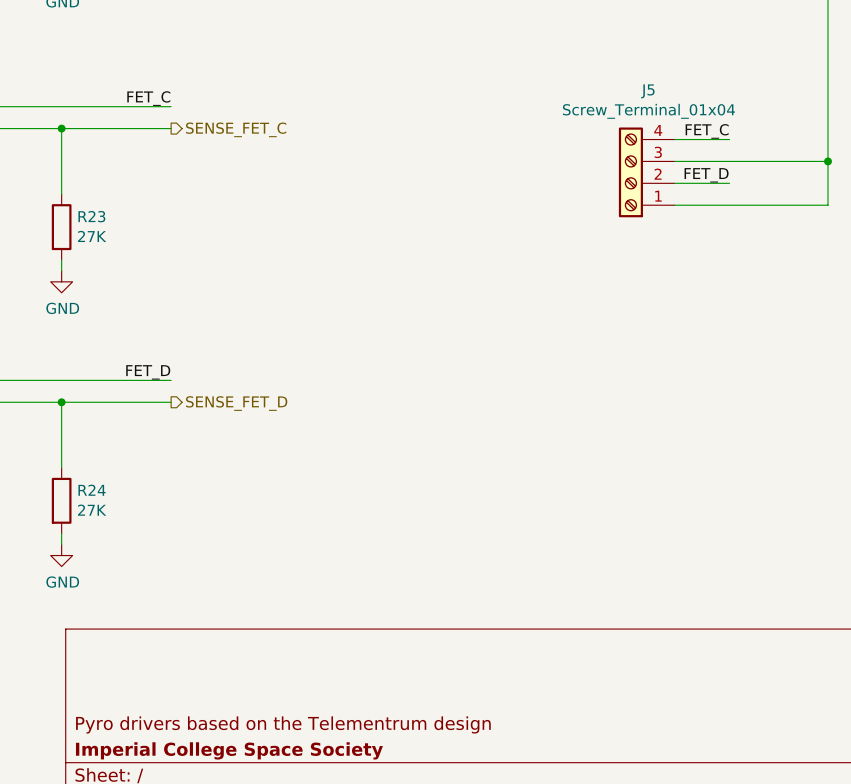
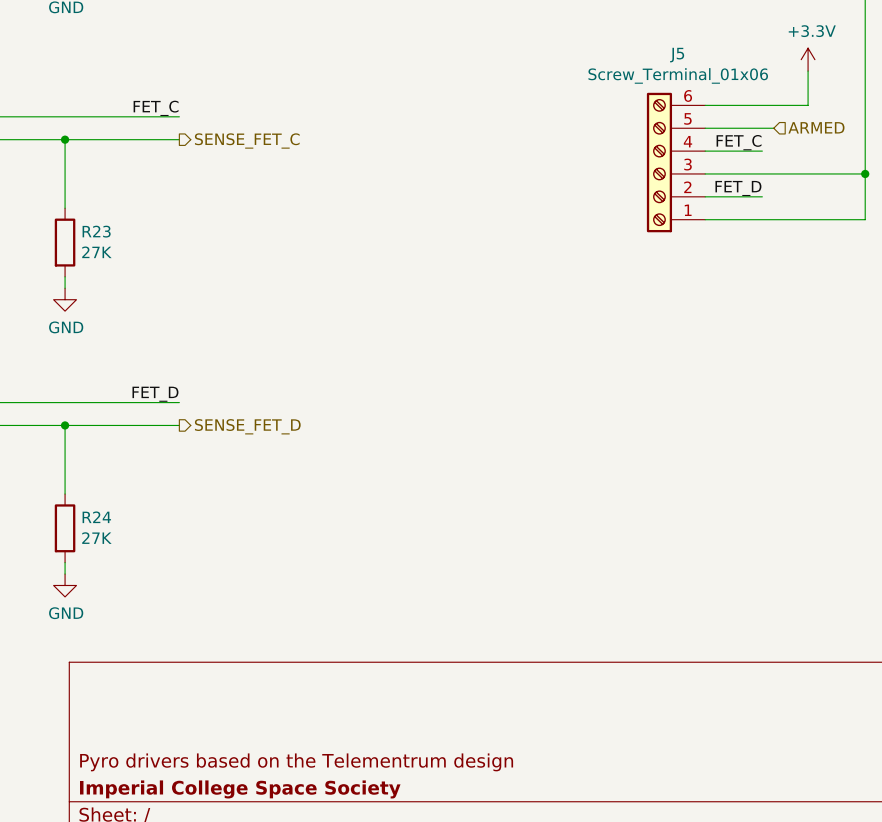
power symbol: none -> +3.3V (808, 59)
wire: none -> (808, 71) (808, 105) (705, 105)
J5 name position: J5 (647, 91) -> J5 (677, 55)
J5 value: Screw_Terminal_01x04 (648, 111) -> Screw_Terminal_01x06 (678, 75)
wire: none -> (705, 128) (773, 128)
hierarchical label: none -> ARMED (816, 127)
J5 symbol: [618, 127, 675, 218] -> [646, 92, 706, 233]

